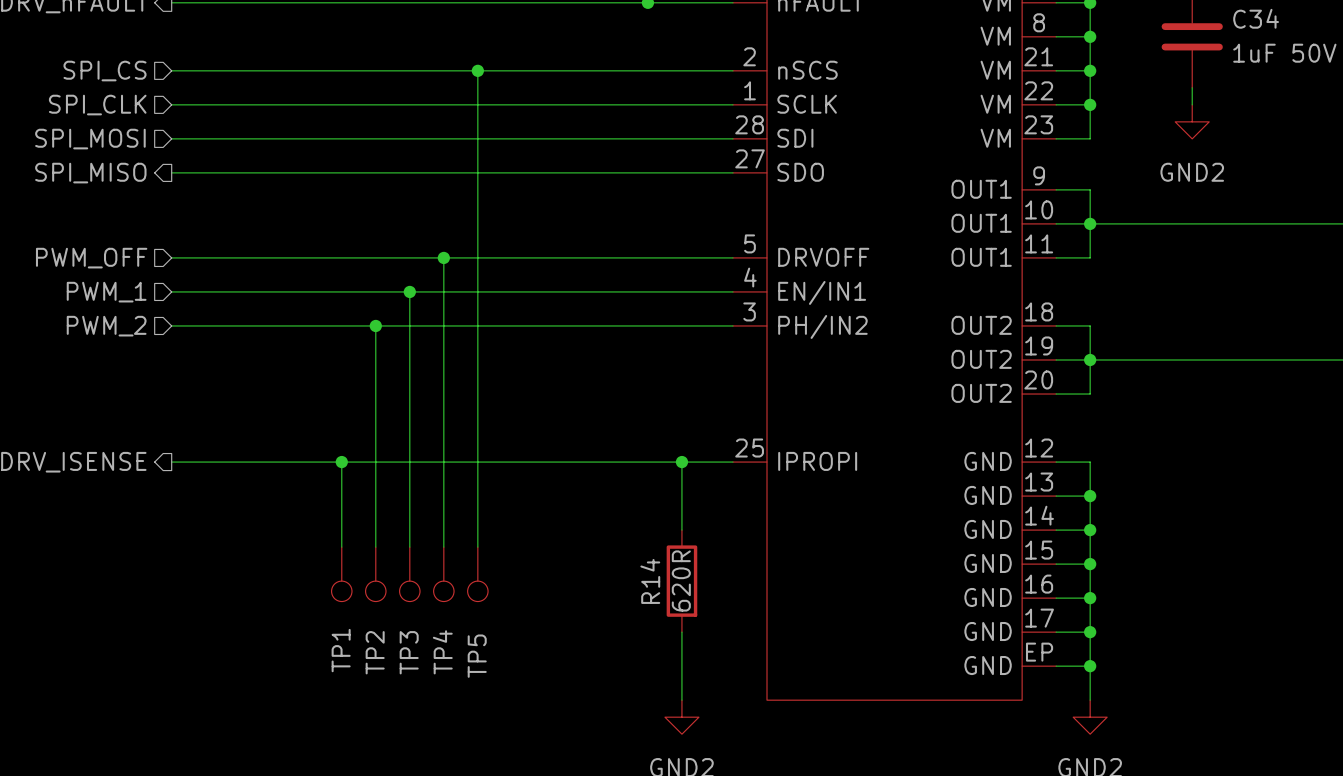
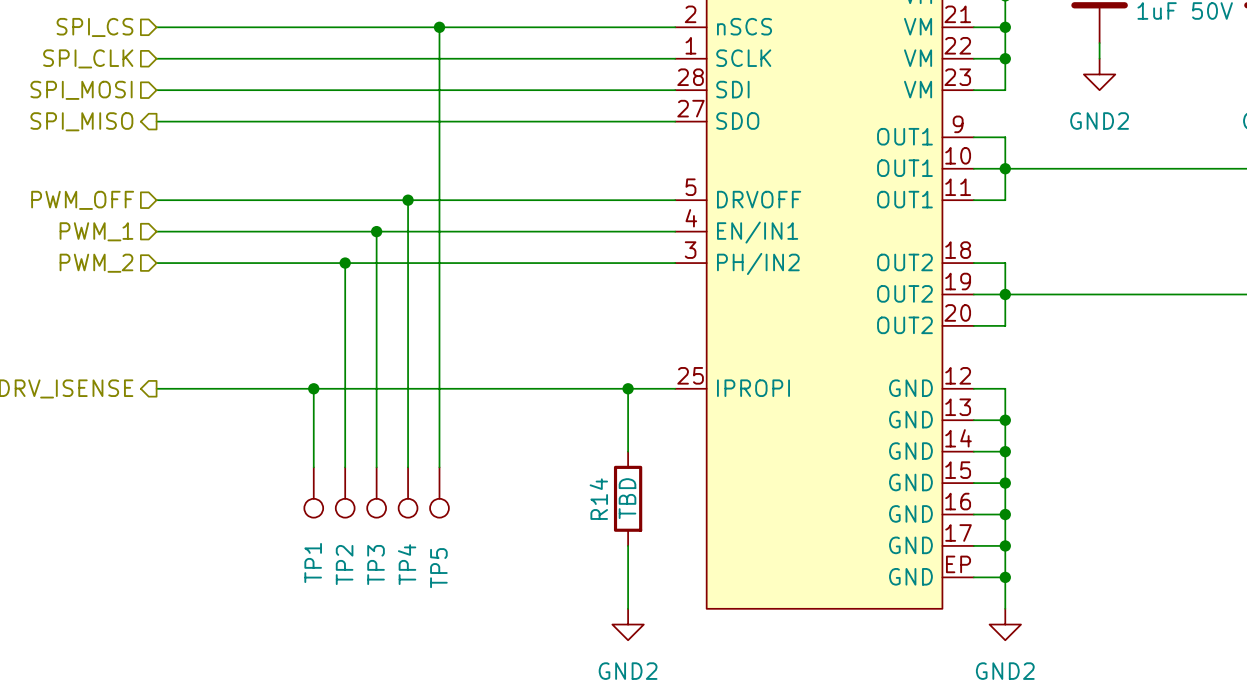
R14 value: 620R (681, 580) -> TBD (627, 498)

